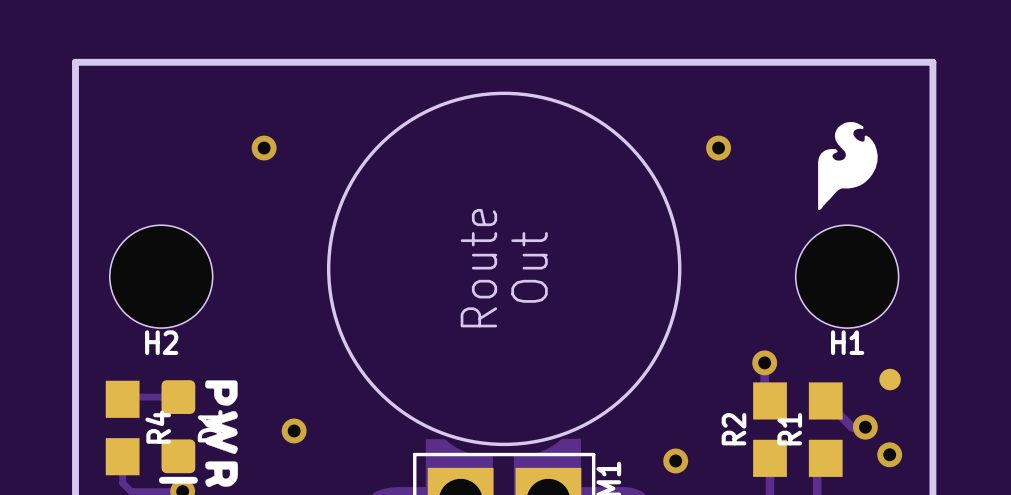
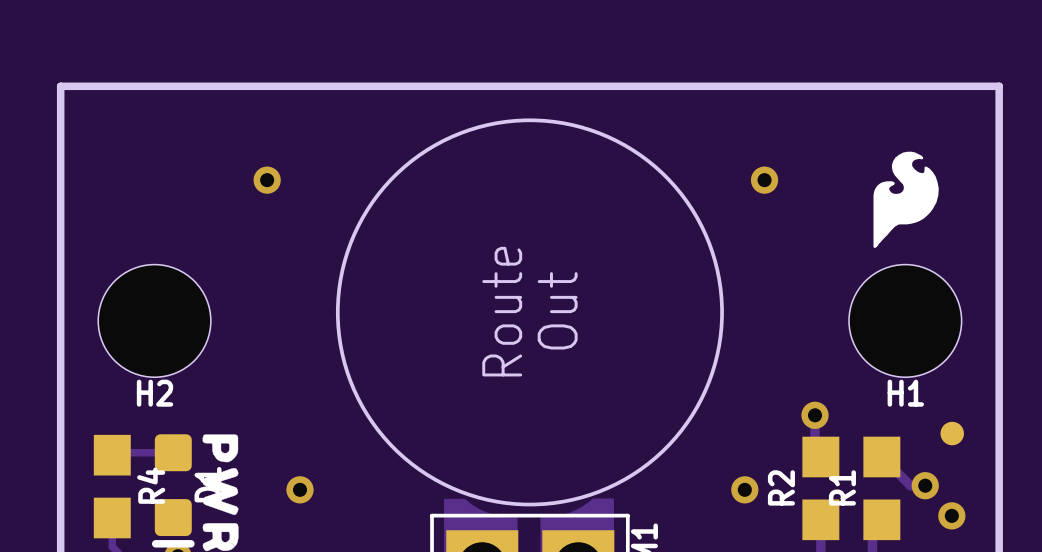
via position: (675, 460) -> (744, 489)

